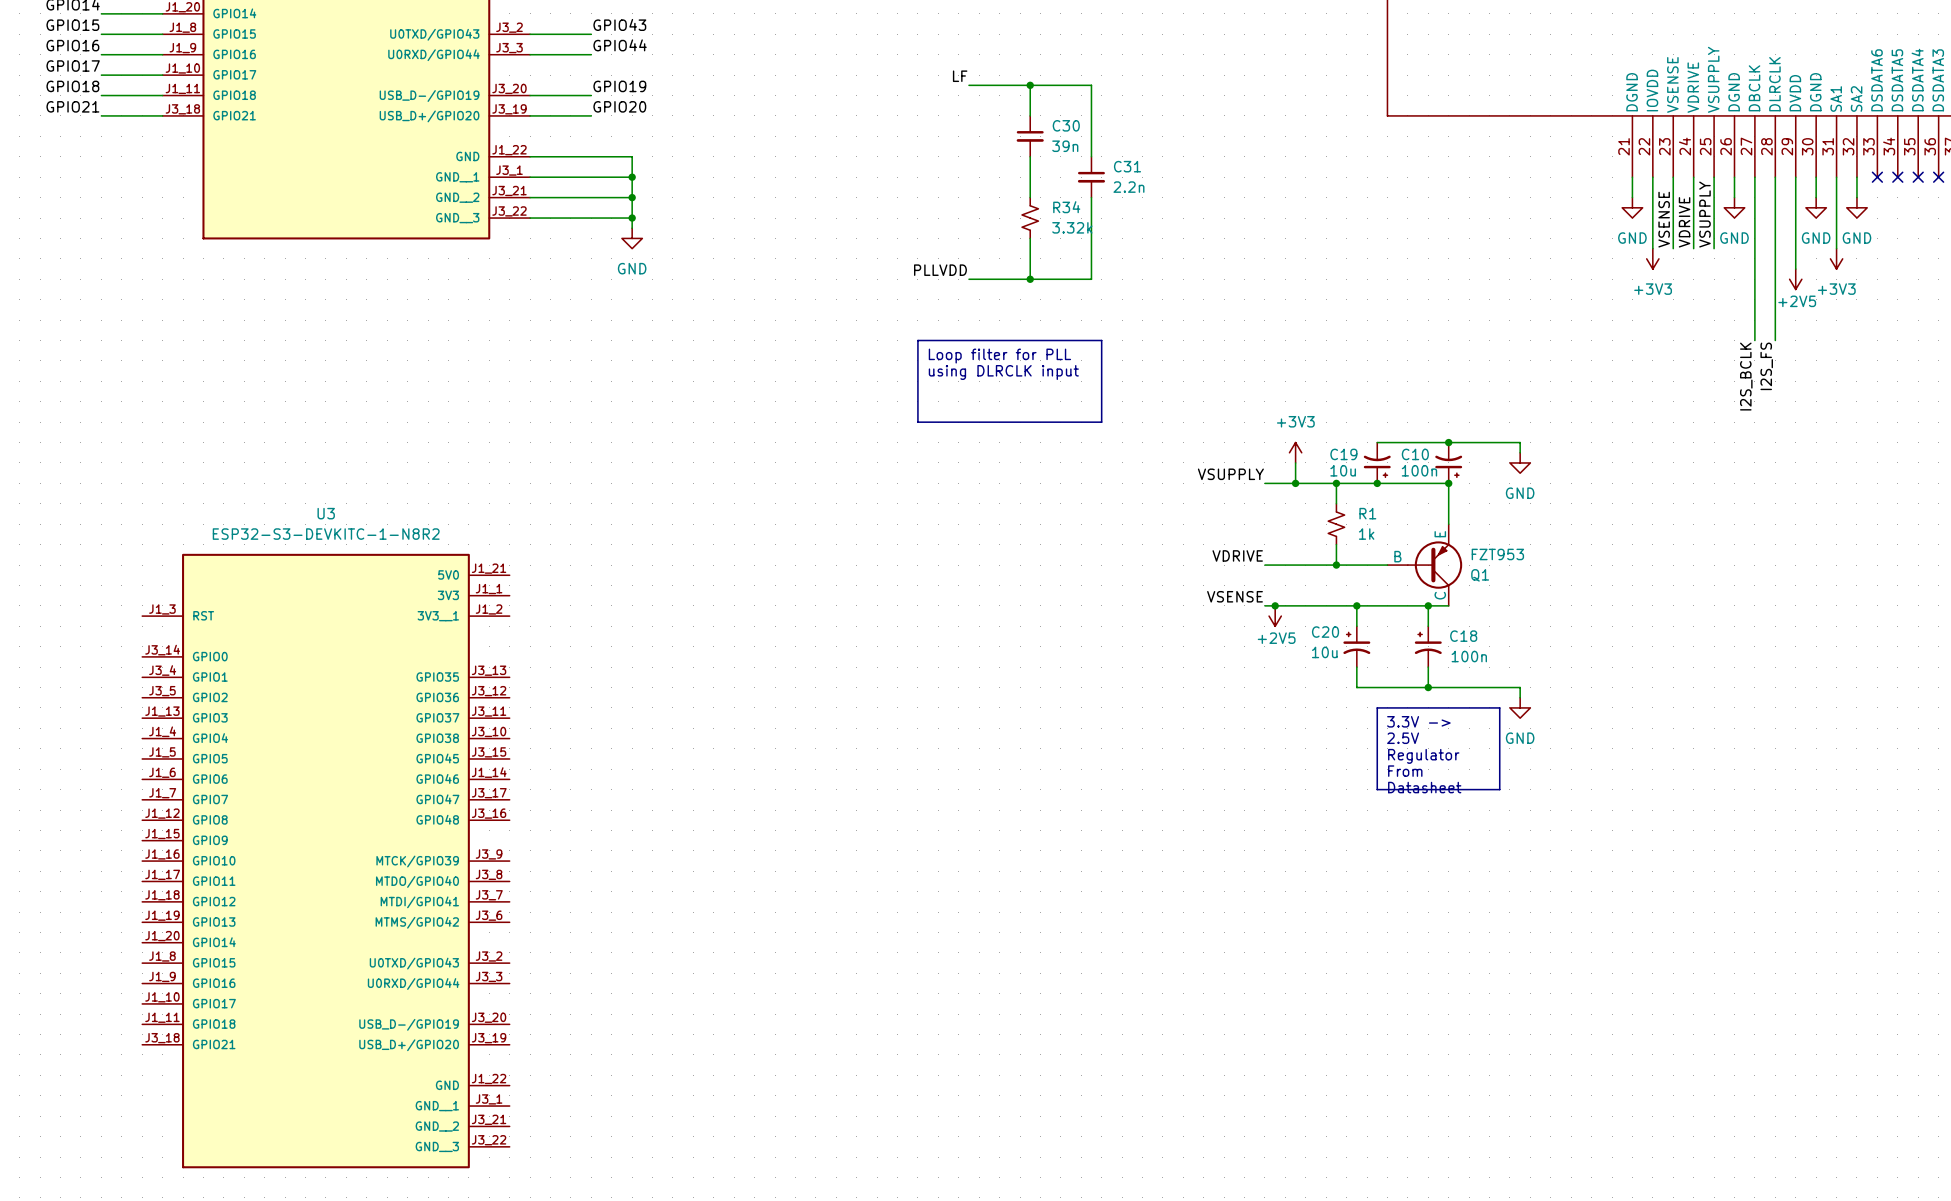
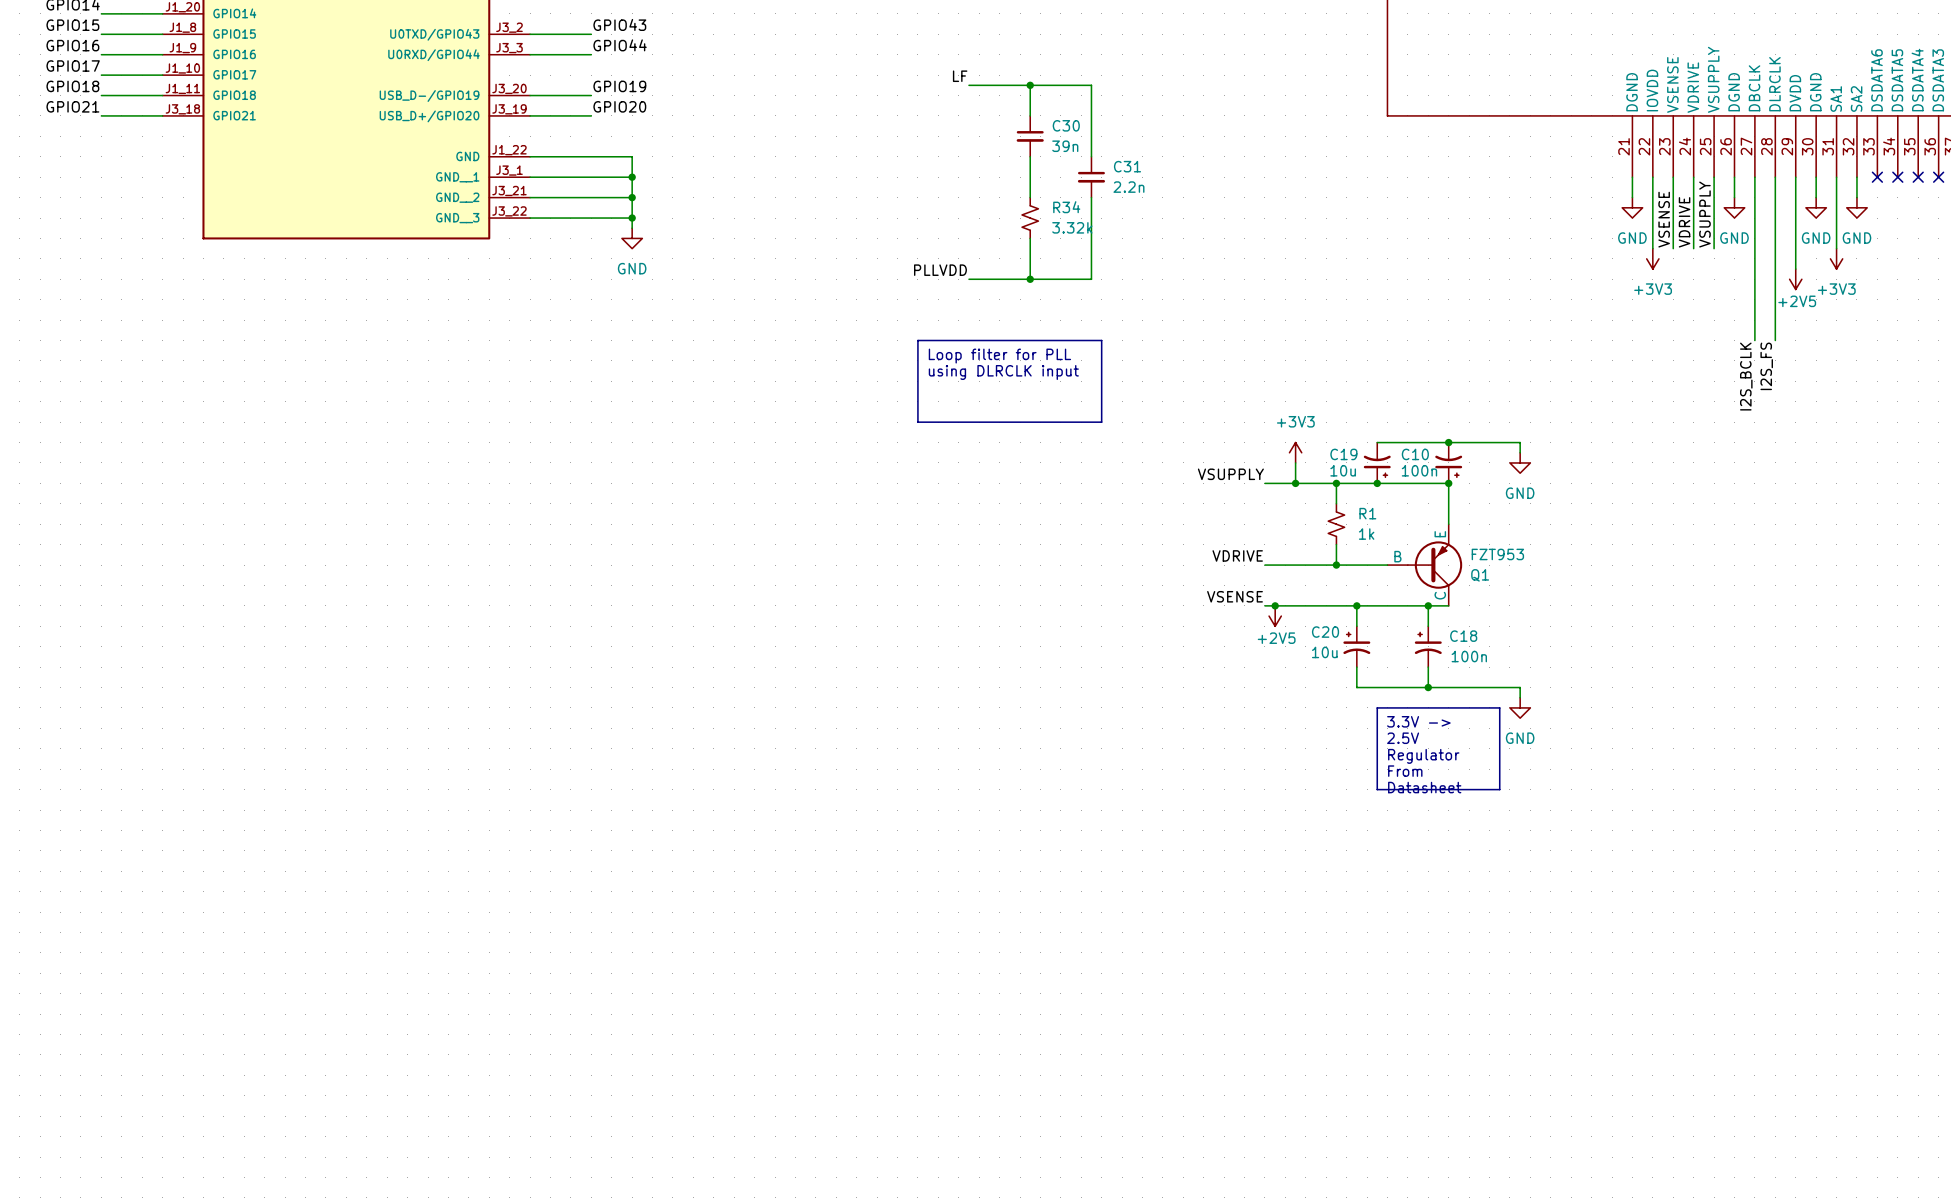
U3: ESP32-S3-DEVKITC-1-N8R2 (325, 861) -> none

